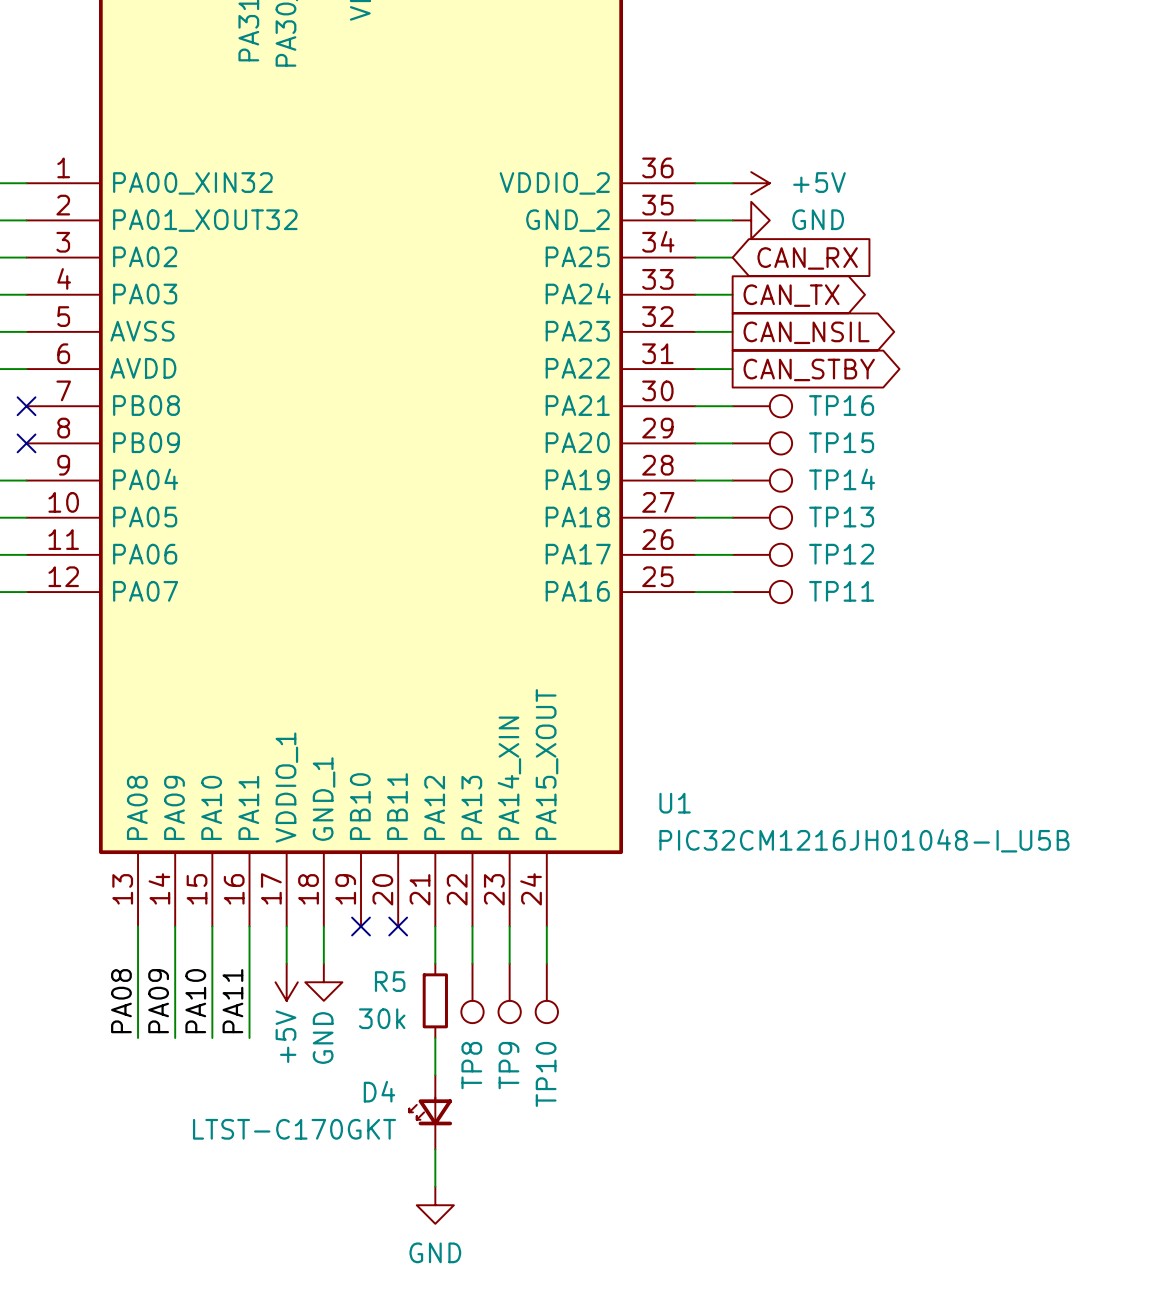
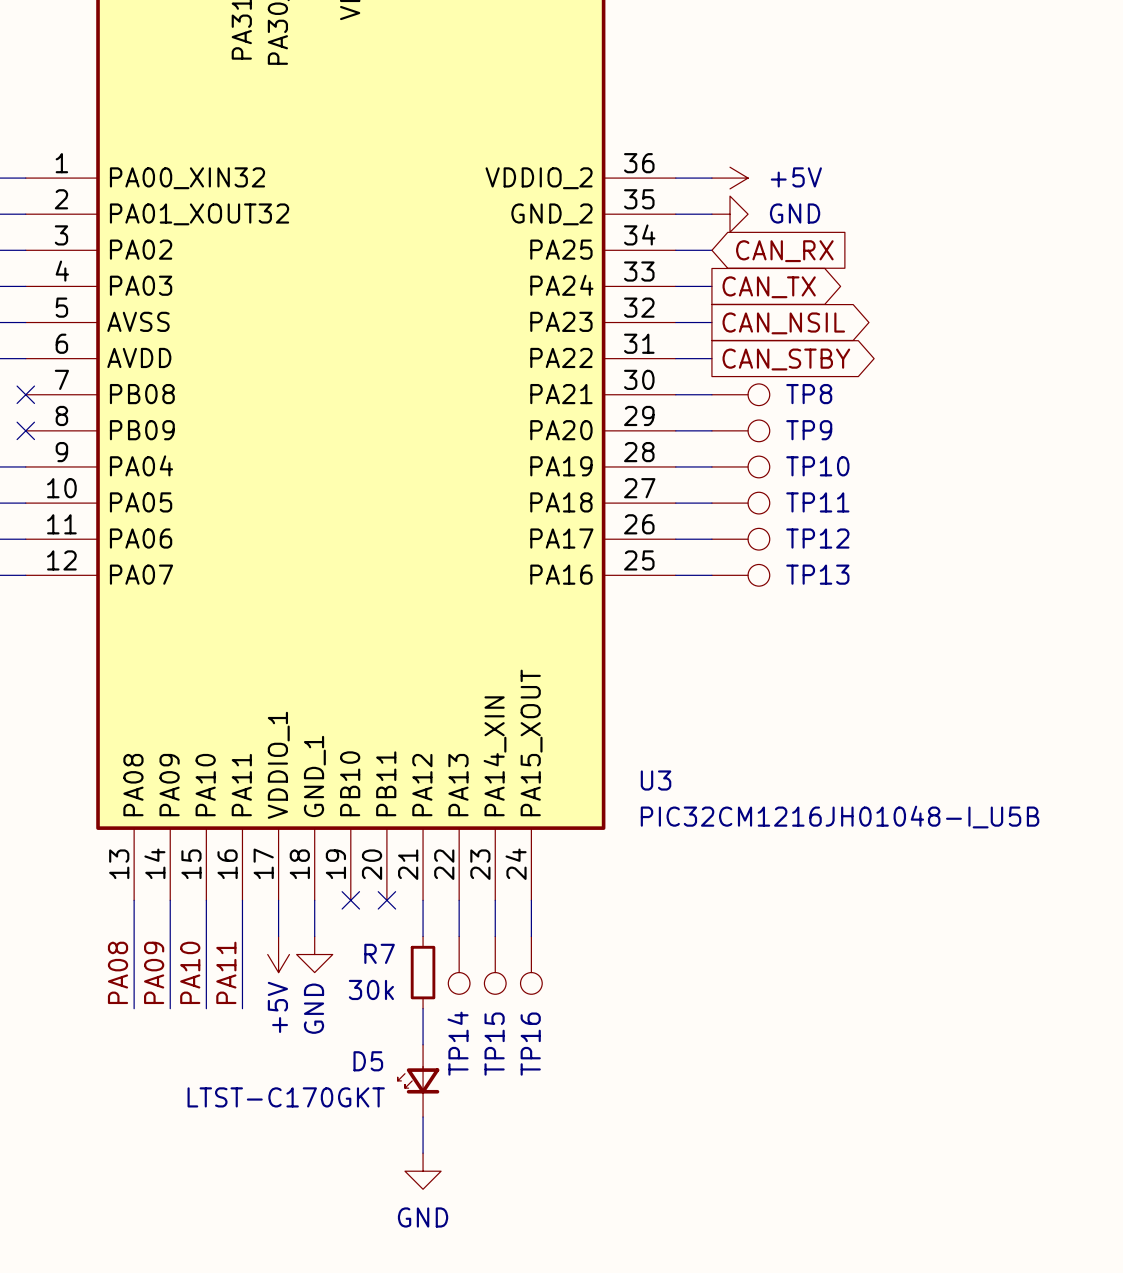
TP16 name: TP16 (841, 405) -> TP8 (809, 394)
TP15 name: TP15 (841, 442) -> TP9 (809, 430)
TP14 name: TP14 (842, 479) -> TP10 (817, 466)
TP13 name: TP13 (841, 517) -> TP11 (817, 502)
TP11 name: TP11 (841, 591) -> TP13 (817, 574)
U1 name: U1 (675, 803) -> U3 (656, 780)
R5 name: R5 (390, 981) -> R7 (379, 953)
TP8 name: TP8 (471, 1065) -> TP14 (458, 1043)
TP9 name: TP9 (508, 1065) -> TP15 (494, 1044)
TP10 name: TP10 (546, 1074) -> TP16 (530, 1044)
D4 name: D4 (379, 1091) -> D5 (368, 1061)

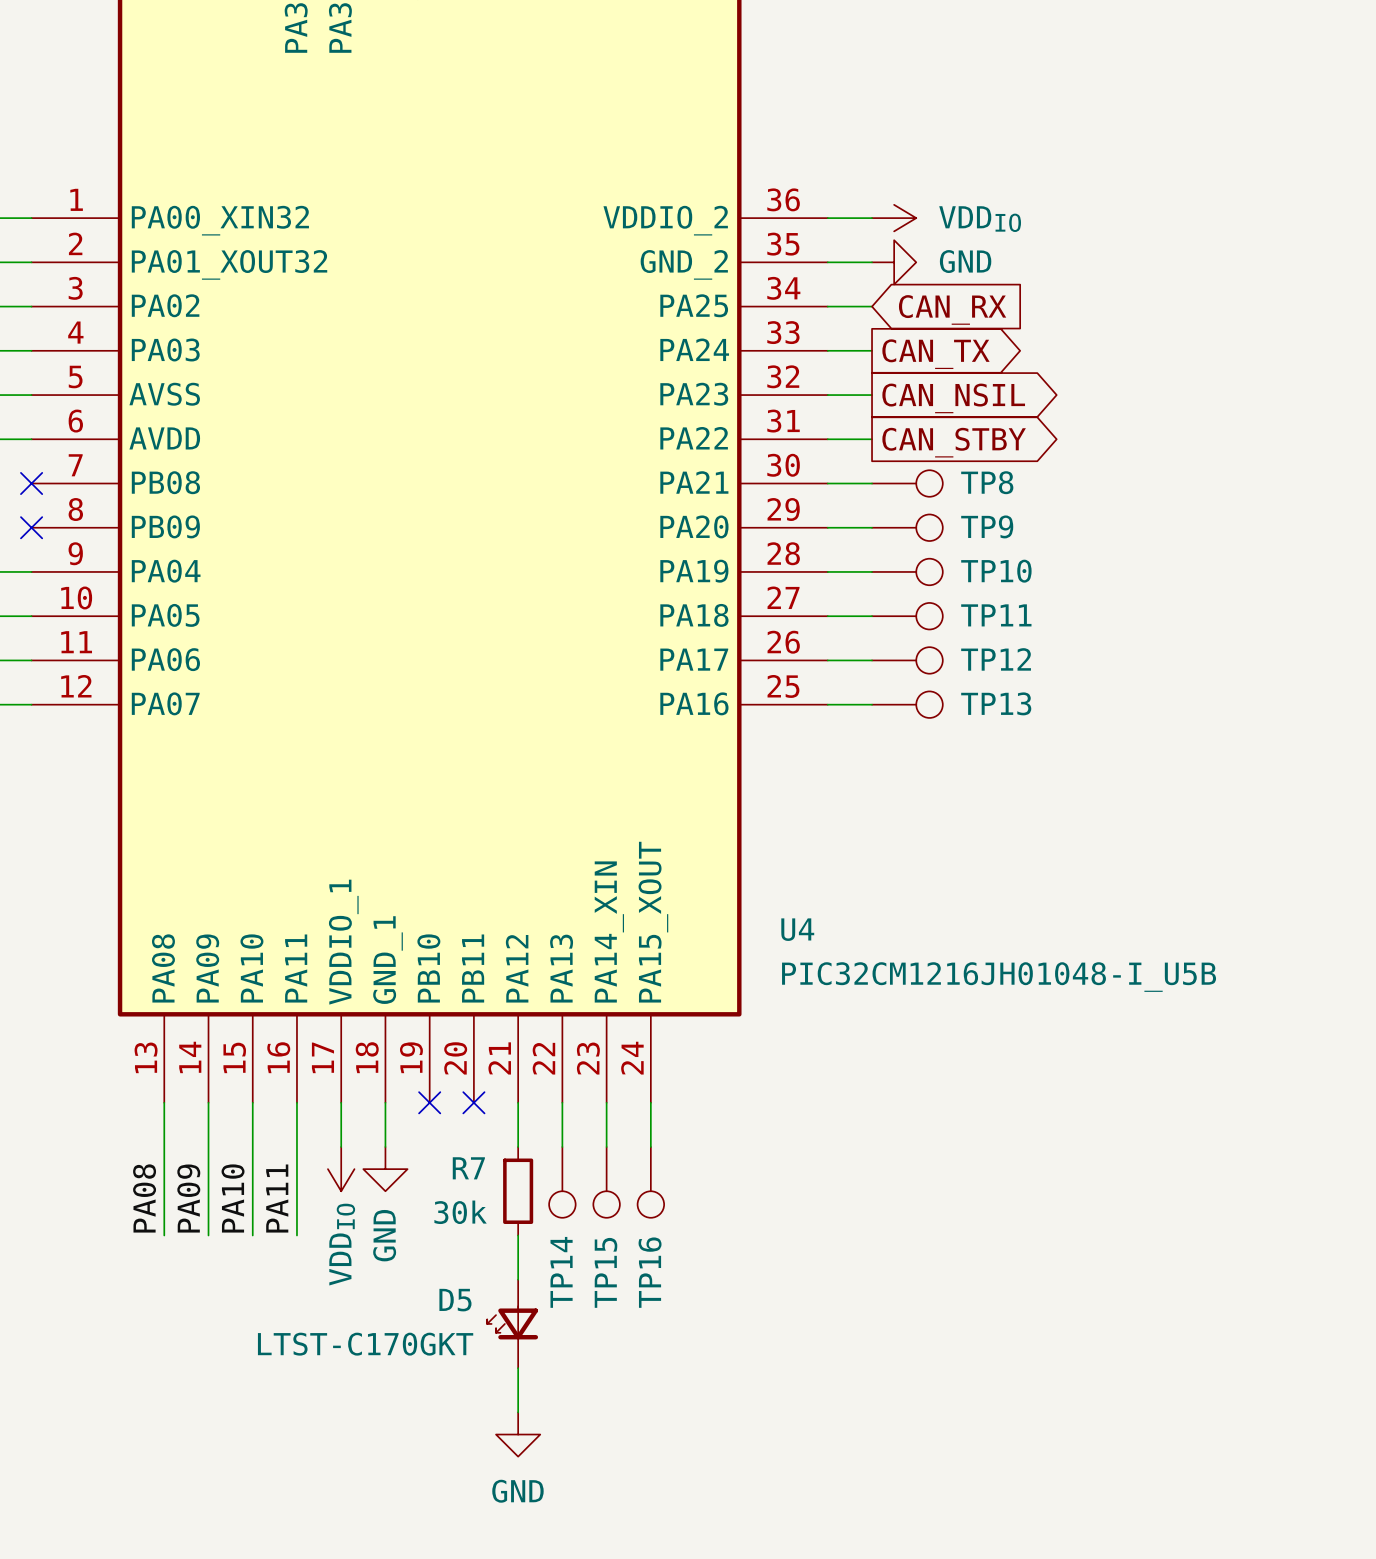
power symbol: +5V (730, 178) -> VDDIO (894, 218)
U3 name: U3 (656, 780) -> U4 (797, 929)
U3 value position: PIC32CM1216JH01048-I_U5B (840, 817) -> PIC32CM1216JH01048-I_U5B (999, 977)
power symbol: +5V (278, 954) -> VDDIO (341, 1169)

